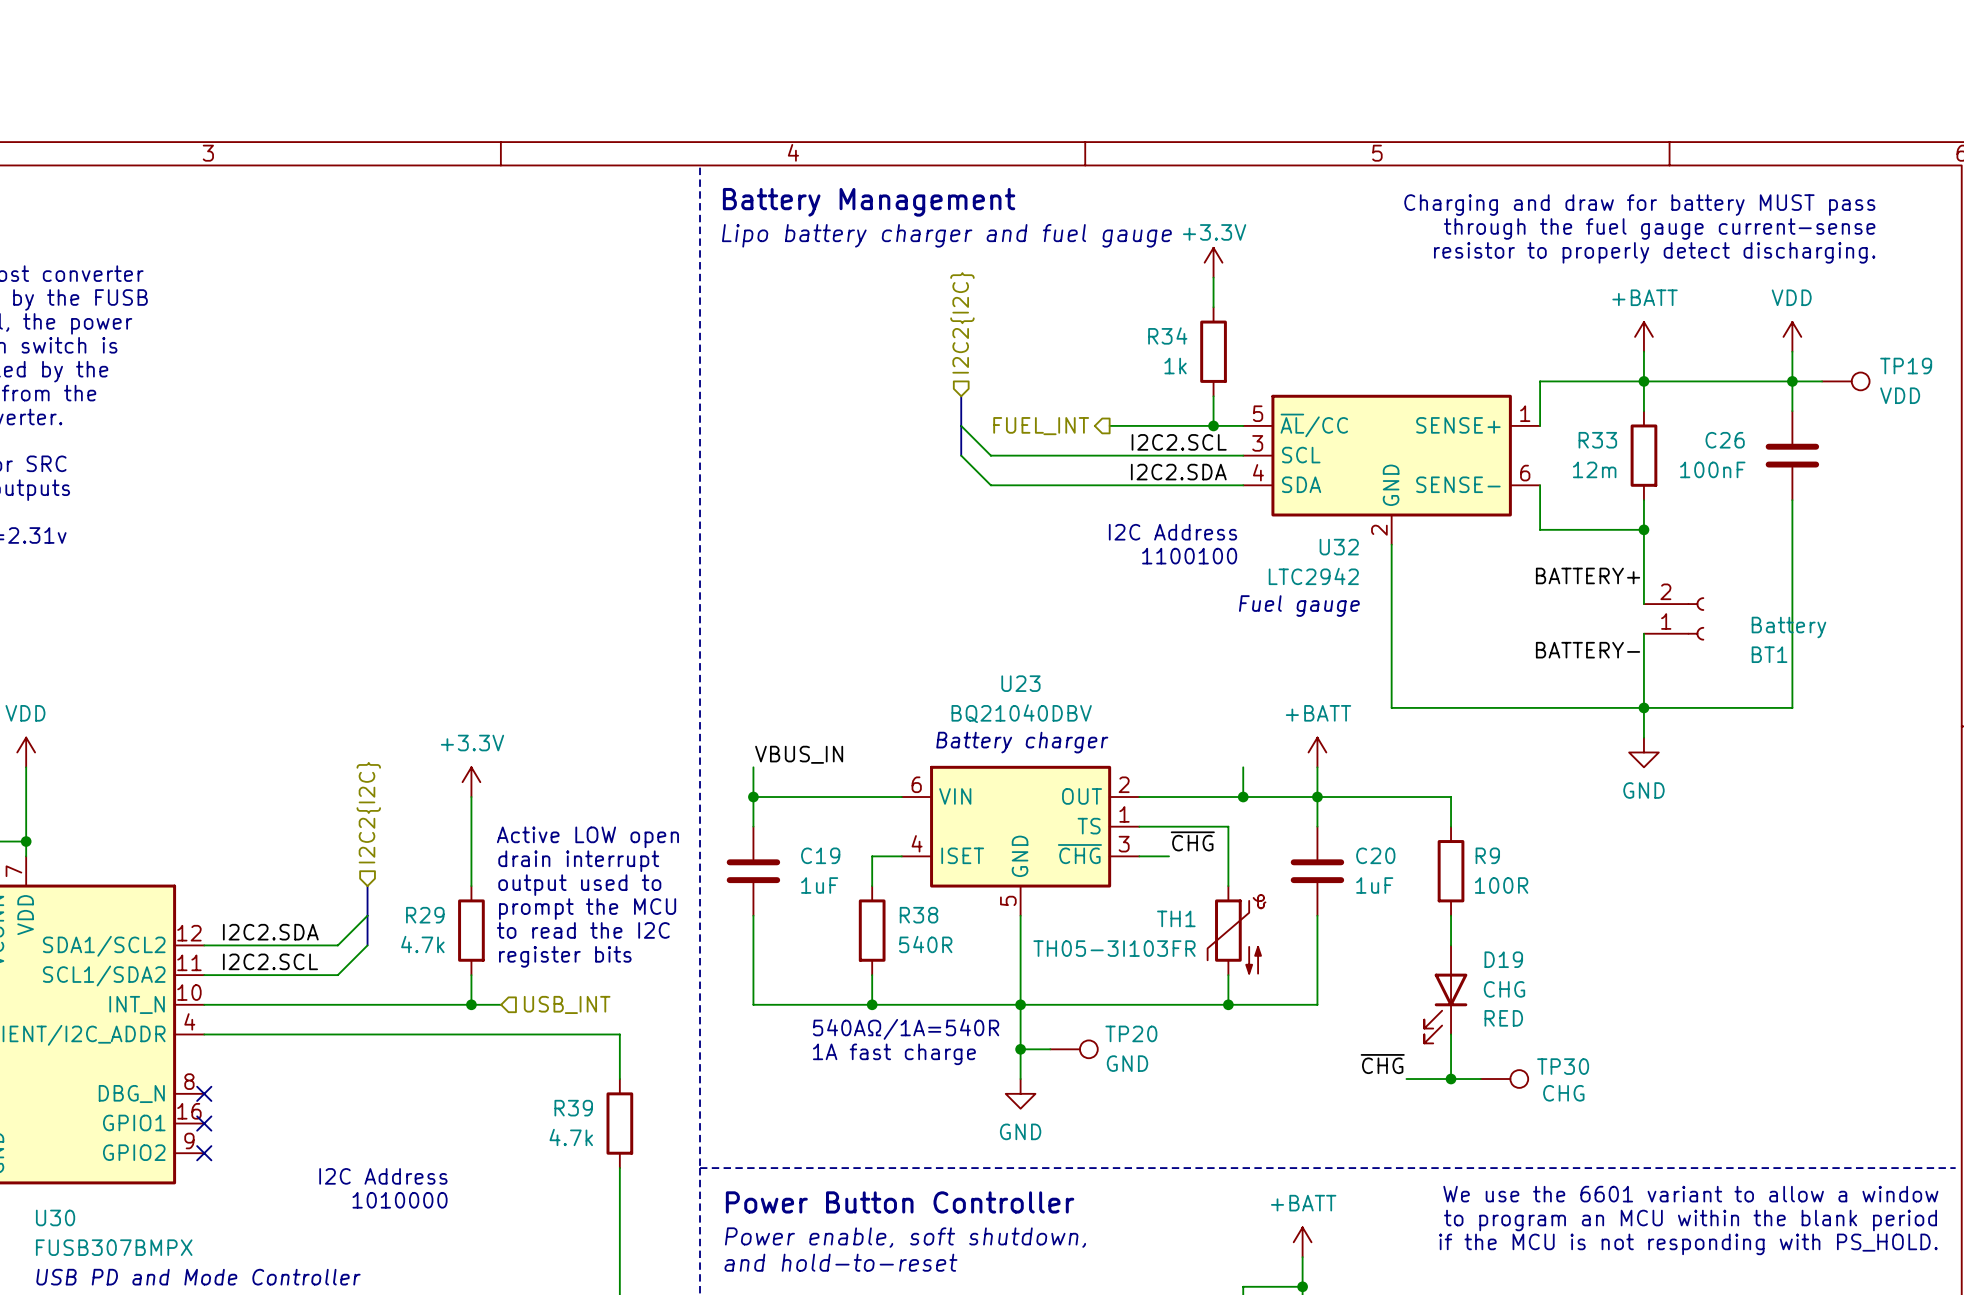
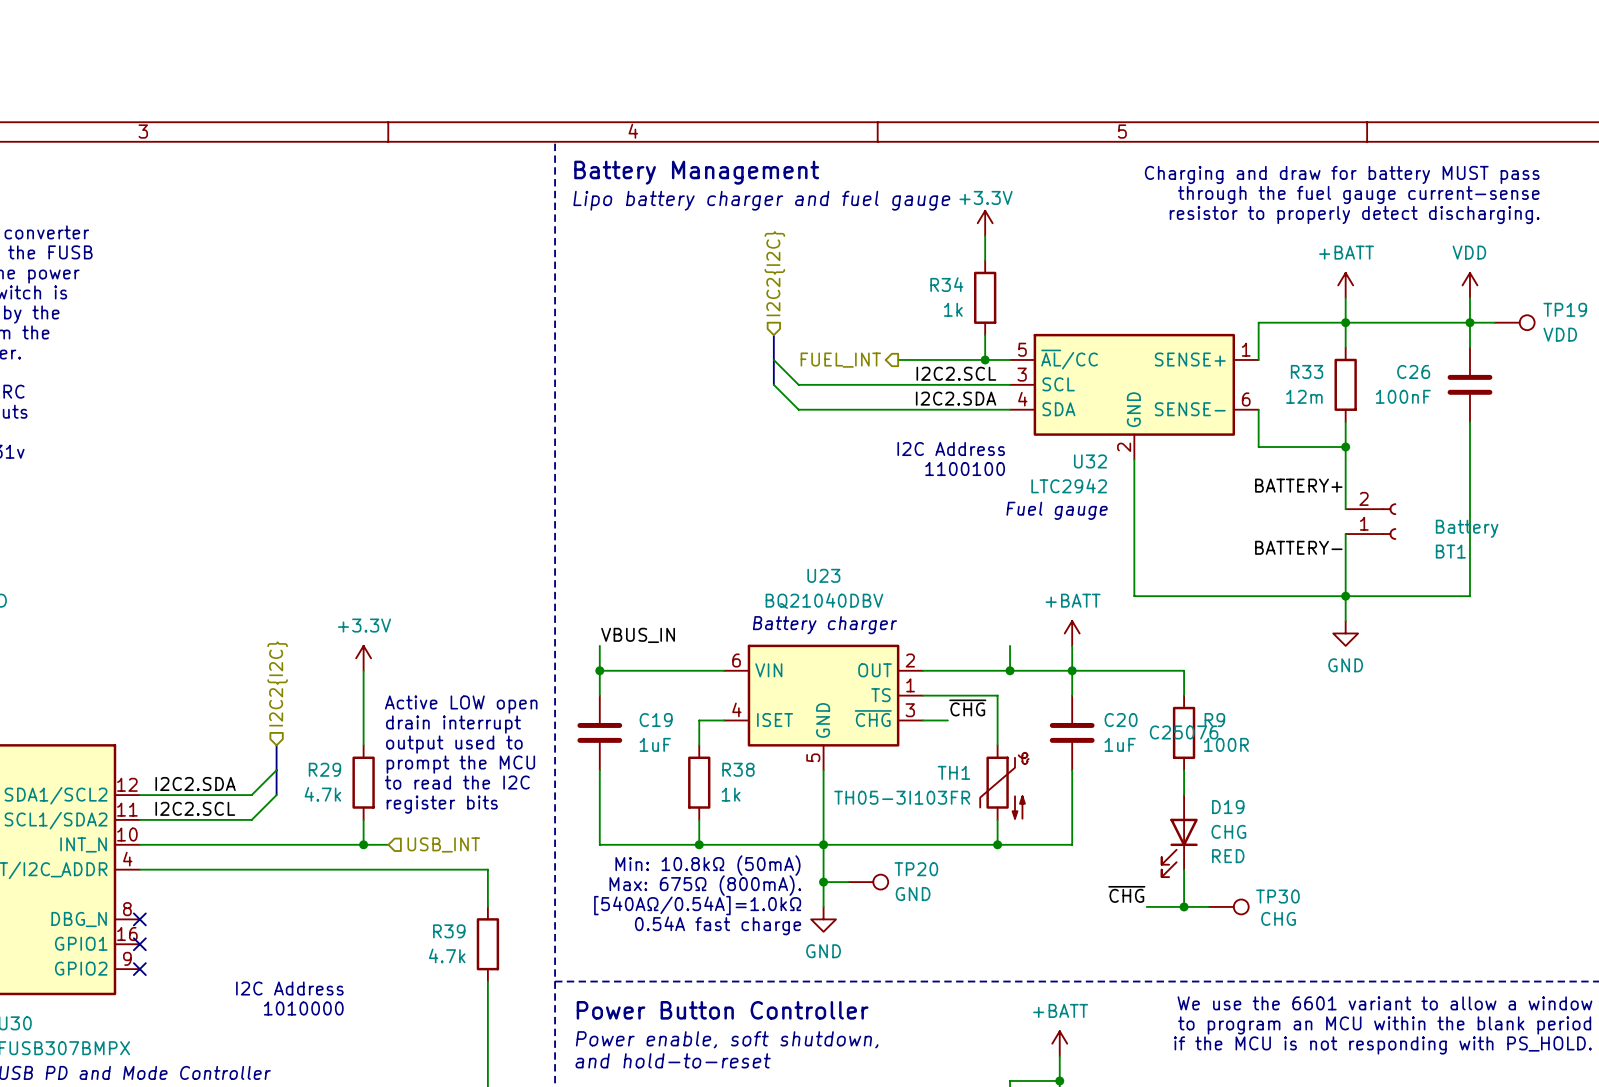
R9 text: none -> C25076 (1184, 732)
R38 value: 540R (925, 944) -> 1k (731, 794)
text: none -> Min: 10.8kΩ (50mA) (707, 865)
text: 540AΩ/1A=540R (906, 1029) -> none
text: none -> Max: 675Ω (800mA). (705, 885)
text: 1A fast charge (894, 1054) -> none
text: none -> [540AΩ/0.54A]=1.0kΩ (697, 905)
text: none -> 0.54A fast charge (718, 925)

